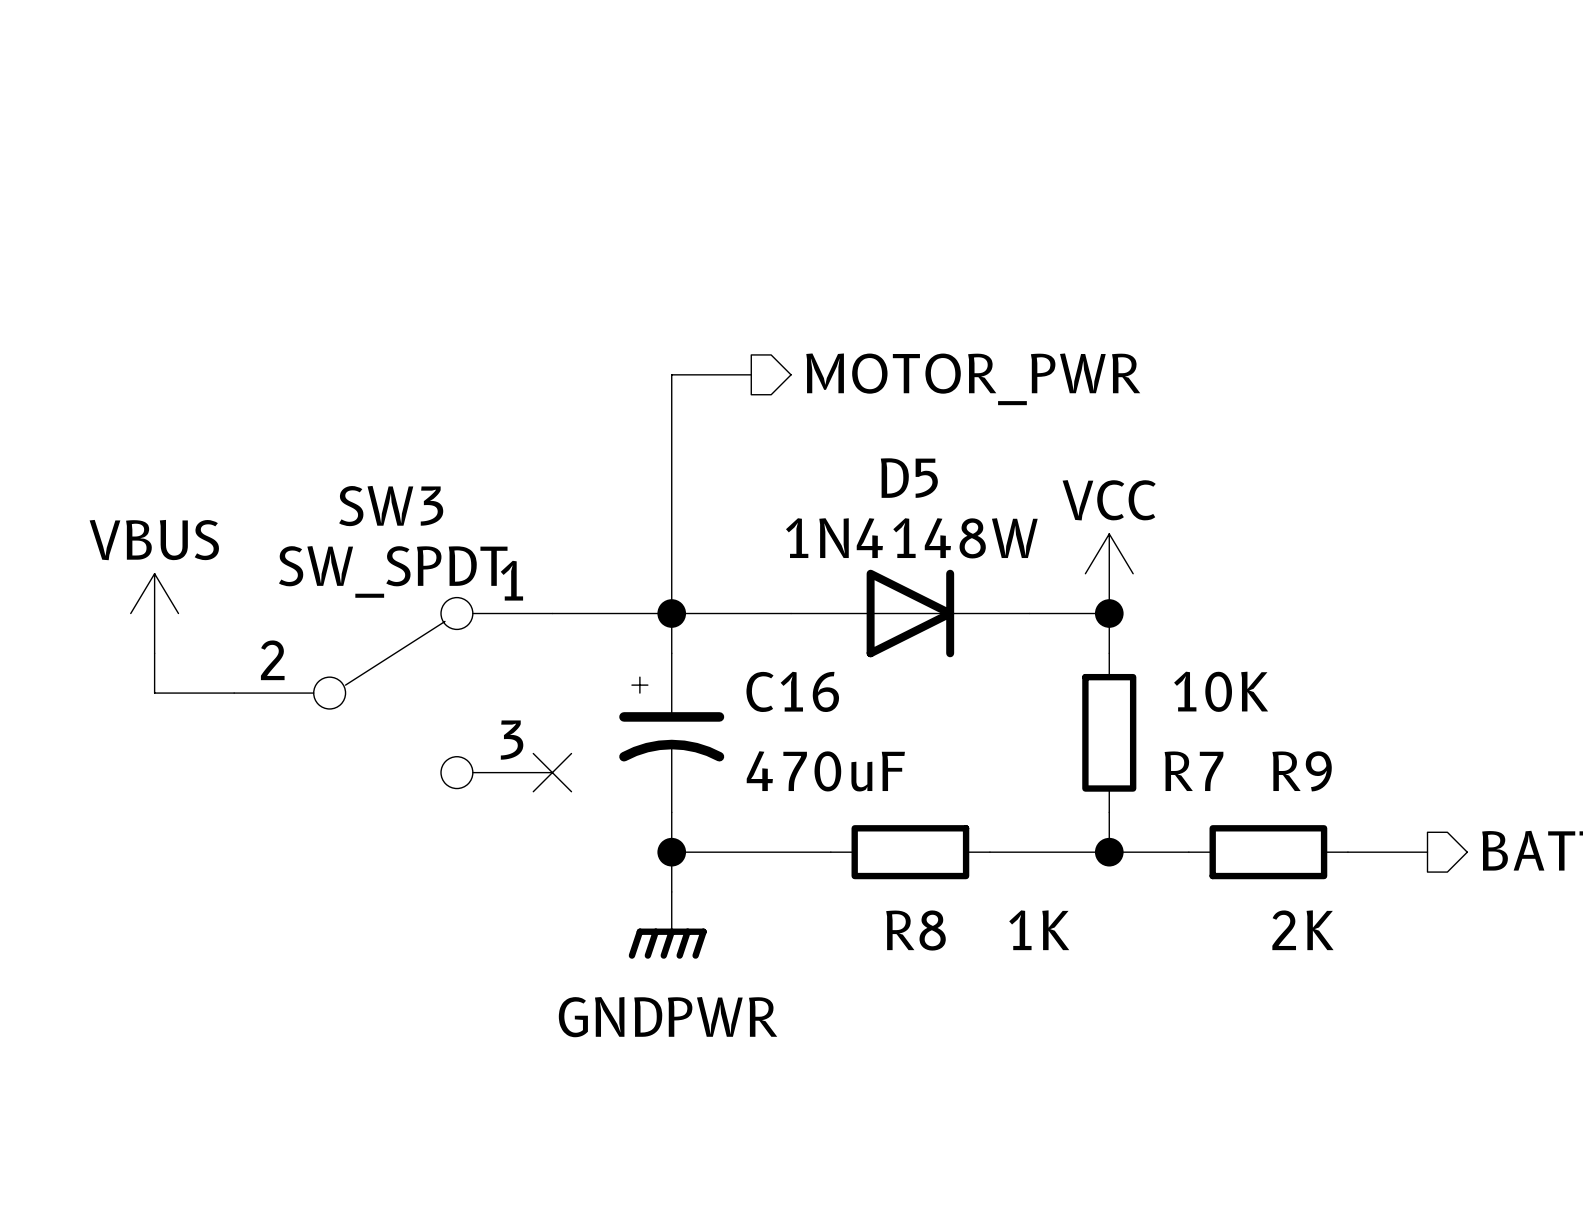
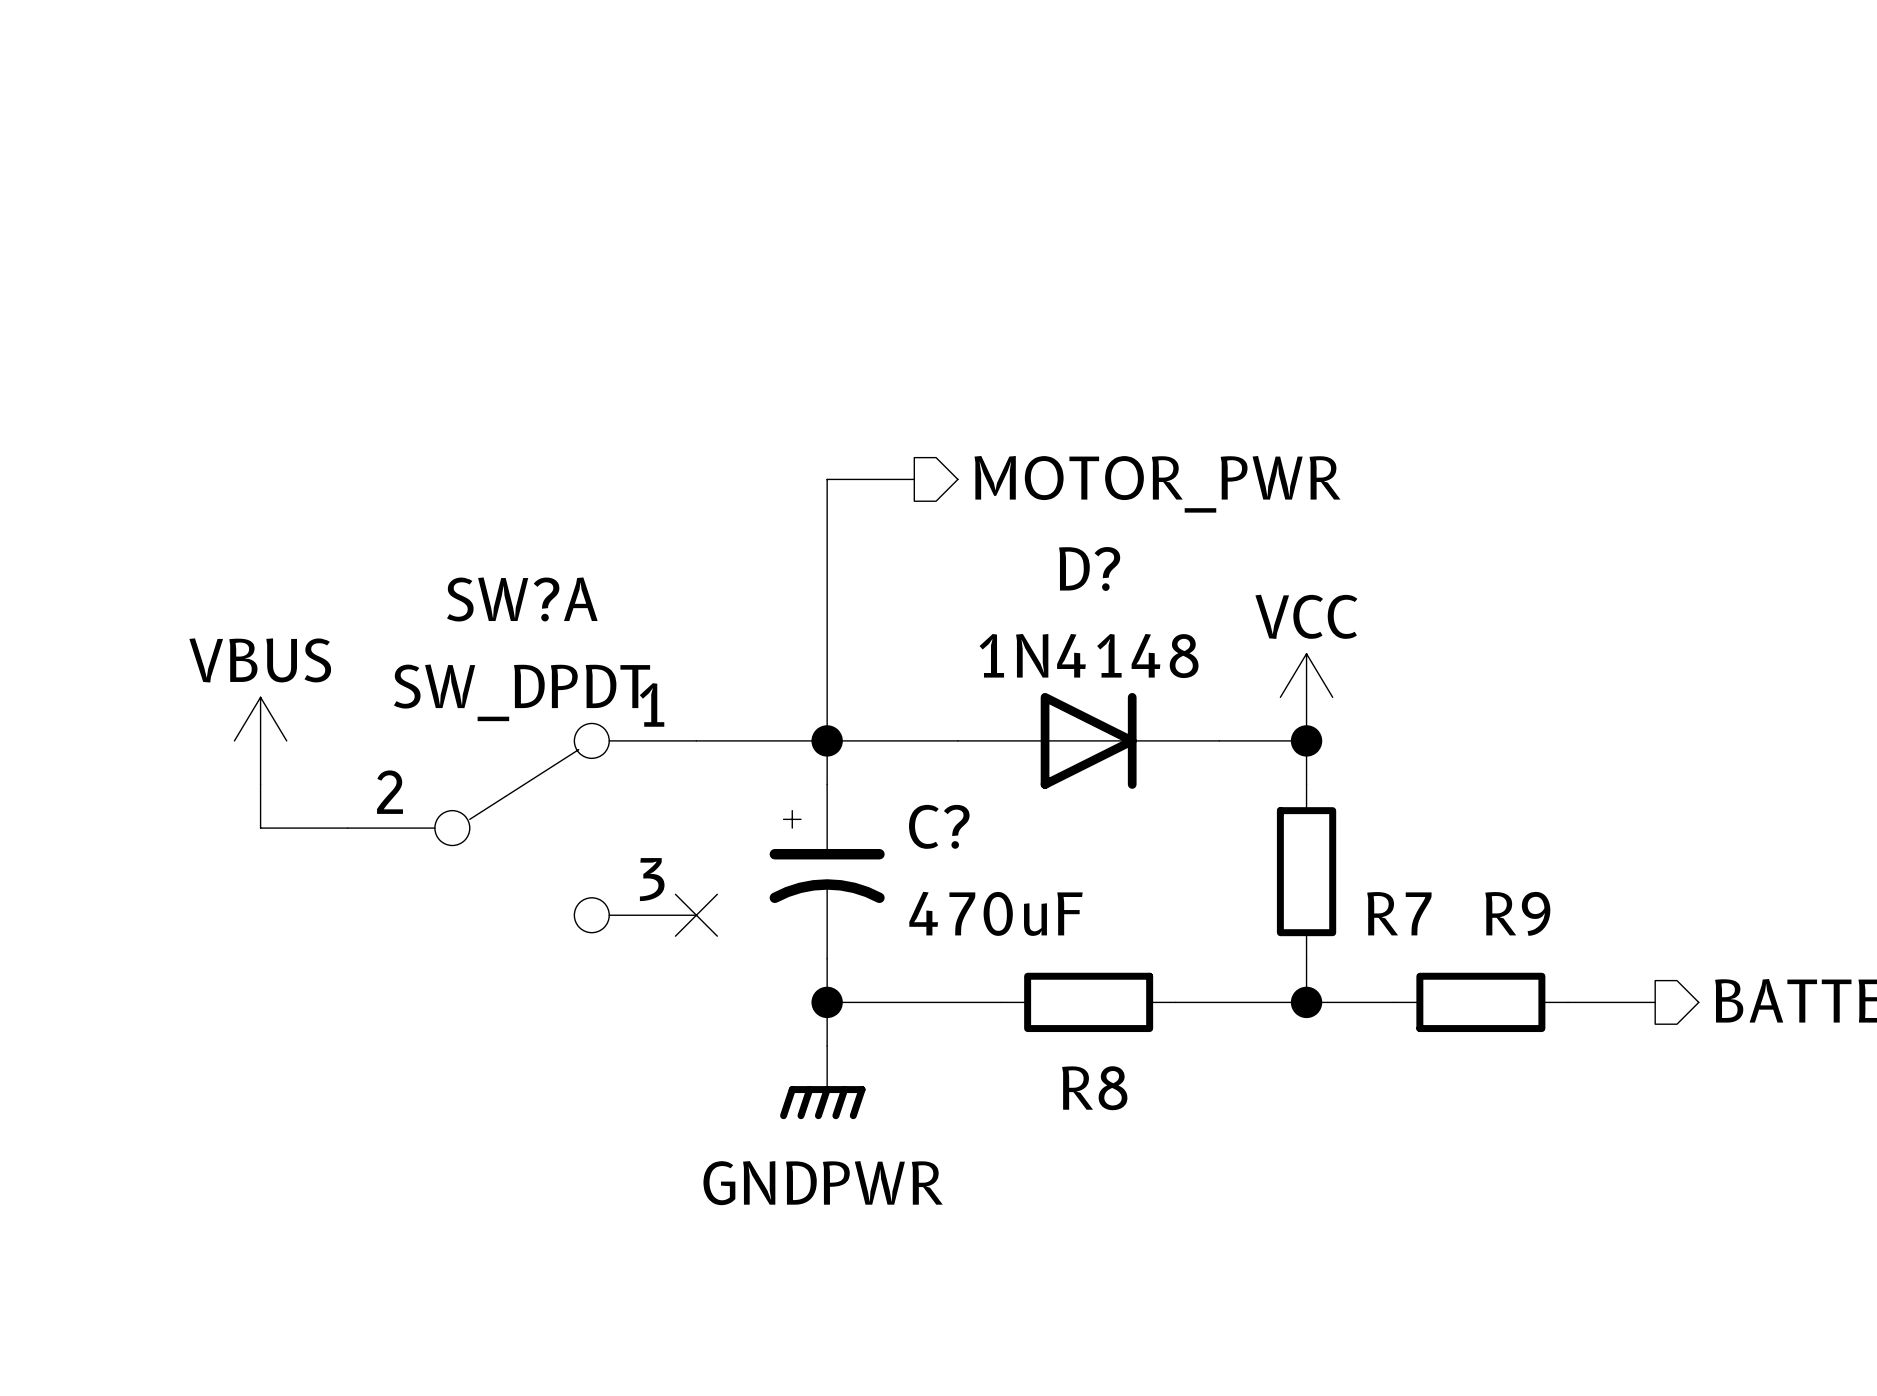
D5 name: D5 (909, 478) -> D? (1089, 568)
SW3 name: SW3 (391, 506) -> SW?A (522, 599)
D5 value: 1N4148W (911, 538) -> 1N4148 (1089, 656)
SW3 value: SW_SPDT (393, 571) -> SW_DPDT (522, 692)
C16 name: C16 (792, 691) -> C? (939, 826)
R7 value: 10K (1221, 691) -> none
R8 value: 1K (1039, 930) -> none
R9 value: 2K (1302, 930) -> none

